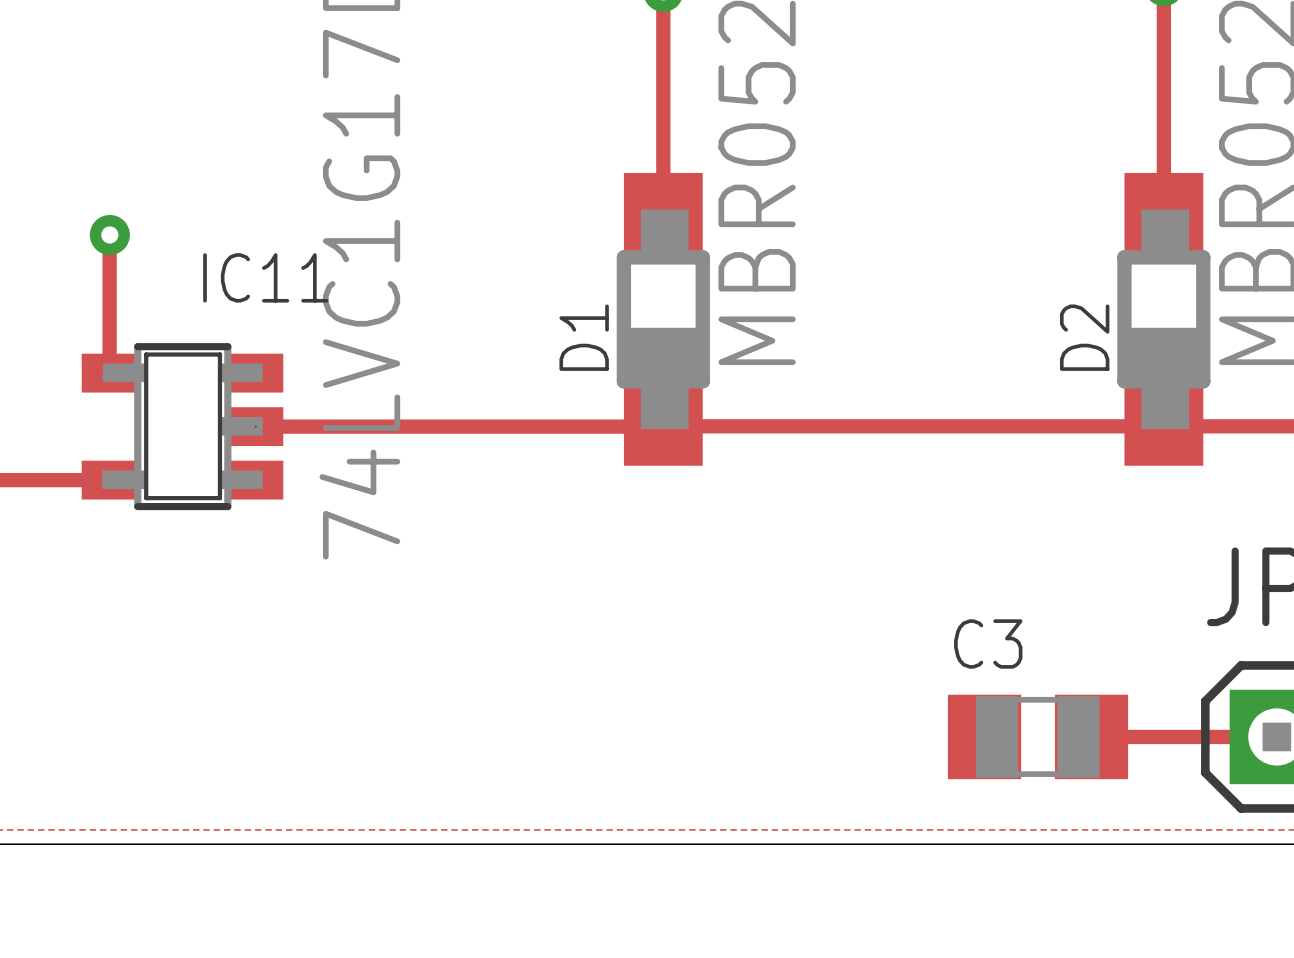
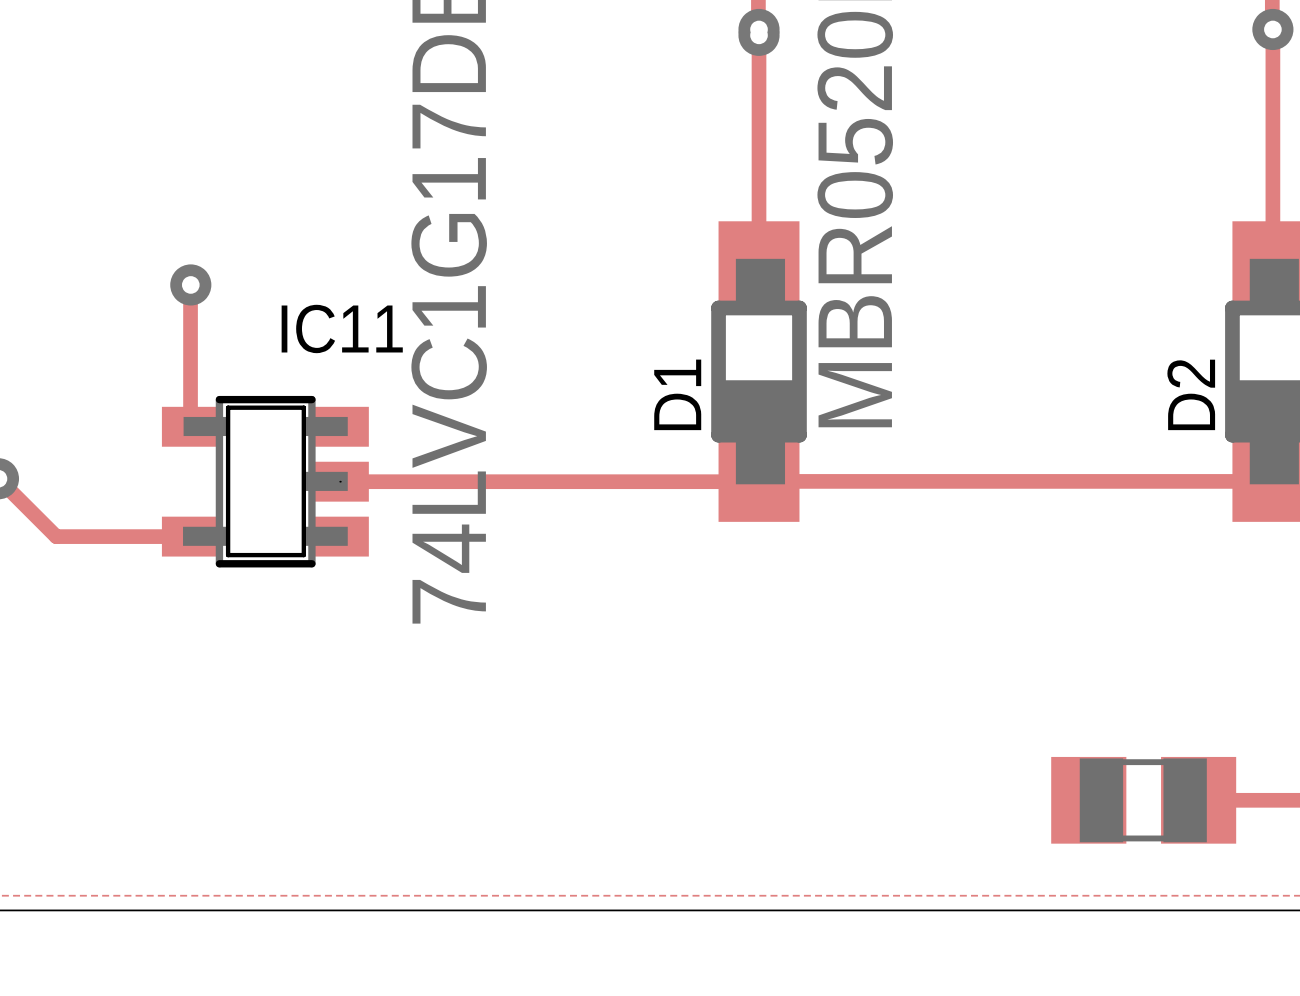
C3 name: C3 (988, 644) -> none

